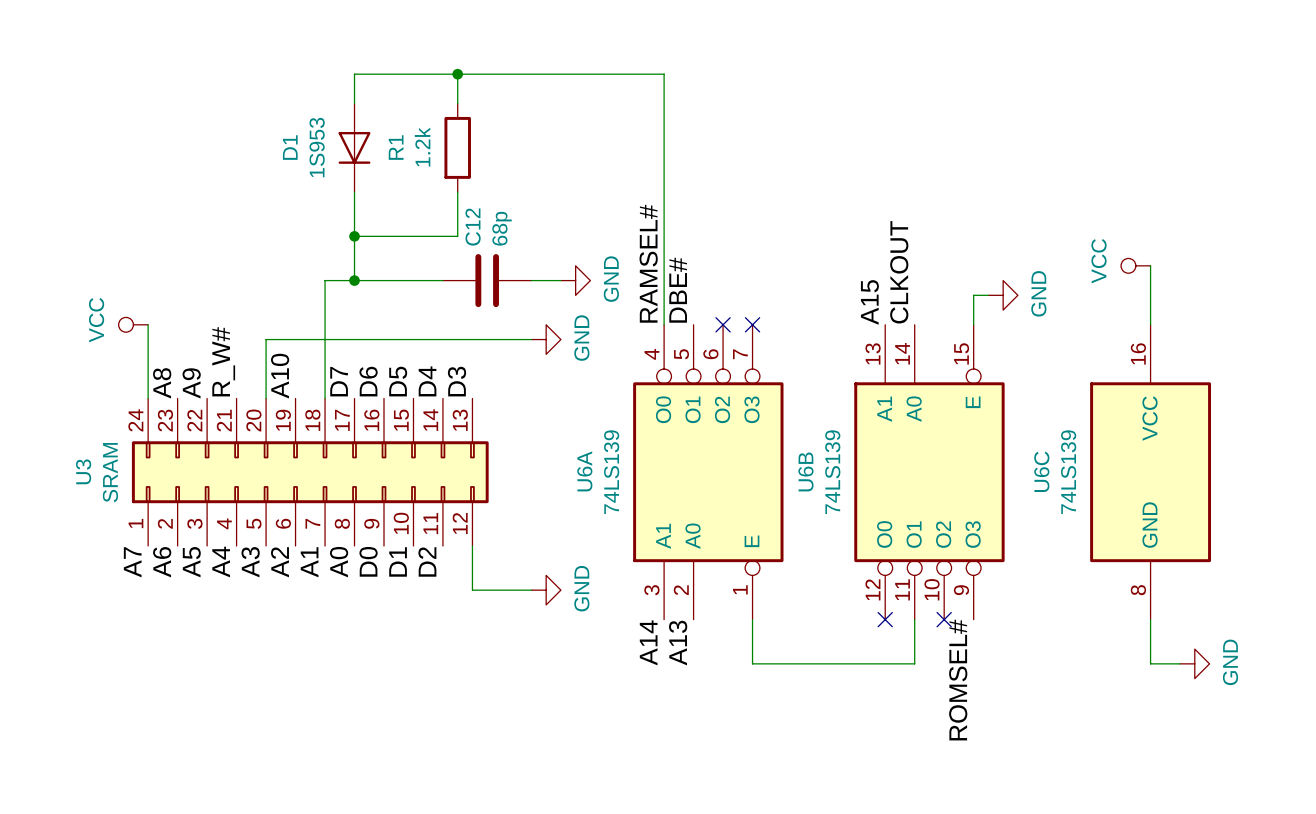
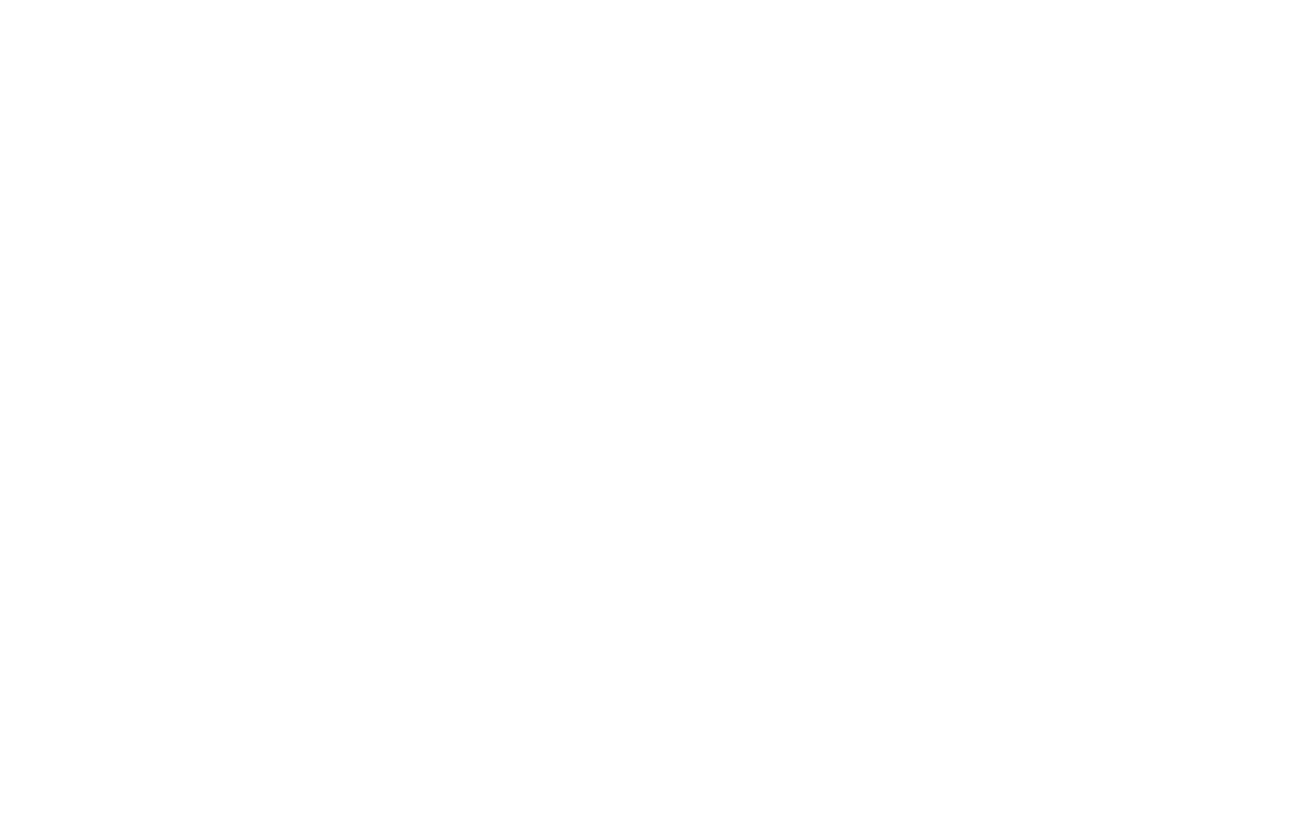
wire: (457, 74) (457, 103) -> none
junction: (457, 74) -> none
wire: (354, 103) (354, 74) (664, 74) (664, 324) -> none
D1: 1S953 (354, 147) -> none
R1: 1.2k (457, 147) -> none
wire: (354, 192) (354, 280) -> none
wire: (457, 192) (457, 236) (354, 236) -> none
junction: (354, 236) -> none
label: RAMSEL# (648, 263) -> none
power symbol: VCC (1135, 265) -> none
wire: (1150, 265) (1150, 324) -> none
label: CLKOUT (899, 272) -> none
junction: (354, 280) -> none
wire: (442, 280) (325, 280) (325, 398) -> none
C12: 68p (487, 280) -> none
wire: (531, 280) (560, 280) -> none
power symbol: GND (575, 280) -> none
label: DBE# (678, 290) -> none
wire: (988, 295) (973, 295) (973, 324) -> none
power symbol: GND (1003, 295) -> none
label: A15 (869, 302) -> none
power symbol: VCC (133, 324) -> none
wire: (148, 324) (148, 398) -> none
no-connect mark: (723, 324) -> none
no-connect mark: (752, 324) -> none
wire: (531, 339) (266, 339) (266, 398) -> none
power symbol: GND (546, 339) -> none
label: R_W# (223, 361) -> none
label: A10 (280, 376) -> none
label: D7 (339, 381) -> none
label: D6 (368, 381) -> none
label: D5 (398, 381) -> none
label: D4 (427, 381) -> none
label: D3 (457, 381) -> none
label: A8 (162, 383) -> none
label: A9 (191, 383) -> none
U3: SRAM (310, 472) -> none
U6A: 74LS139 (708, 472) -> none
U6B: 74LS139 (929, 472) -> none
U6C: 74LS139 (1150, 472) -> none
wire: (472, 545) (472, 590) (531, 590) -> none
label: D0 (368, 561) -> none
label: D1 (398, 561) -> none
label: D2 (427, 561) -> none
label: A7 (132, 562) -> none
label: A6 (162, 562) -> none
label: A5 (191, 562) -> none
label: A4 (221, 562) -> none
label: A3 (250, 562) -> none
label: A2 (279, 562) -> none
label: A1 (309, 562) -> none
label: A0 (339, 562) -> none
power symbol: GND (546, 590) -> none
wire: (752, 619) (752, 663) (914, 663) (914, 619) -> none
no-connect mark: (885, 619) -> none
no-connect mark: (944, 619) -> none
wire: (1150, 619) (1150, 663) (1180, 663) -> none
label: A14 (648, 642) -> none
label: A13 (678, 643) -> none
power symbol: GND (1194, 663) -> none
label: ROMSEL# (958, 680) -> none

